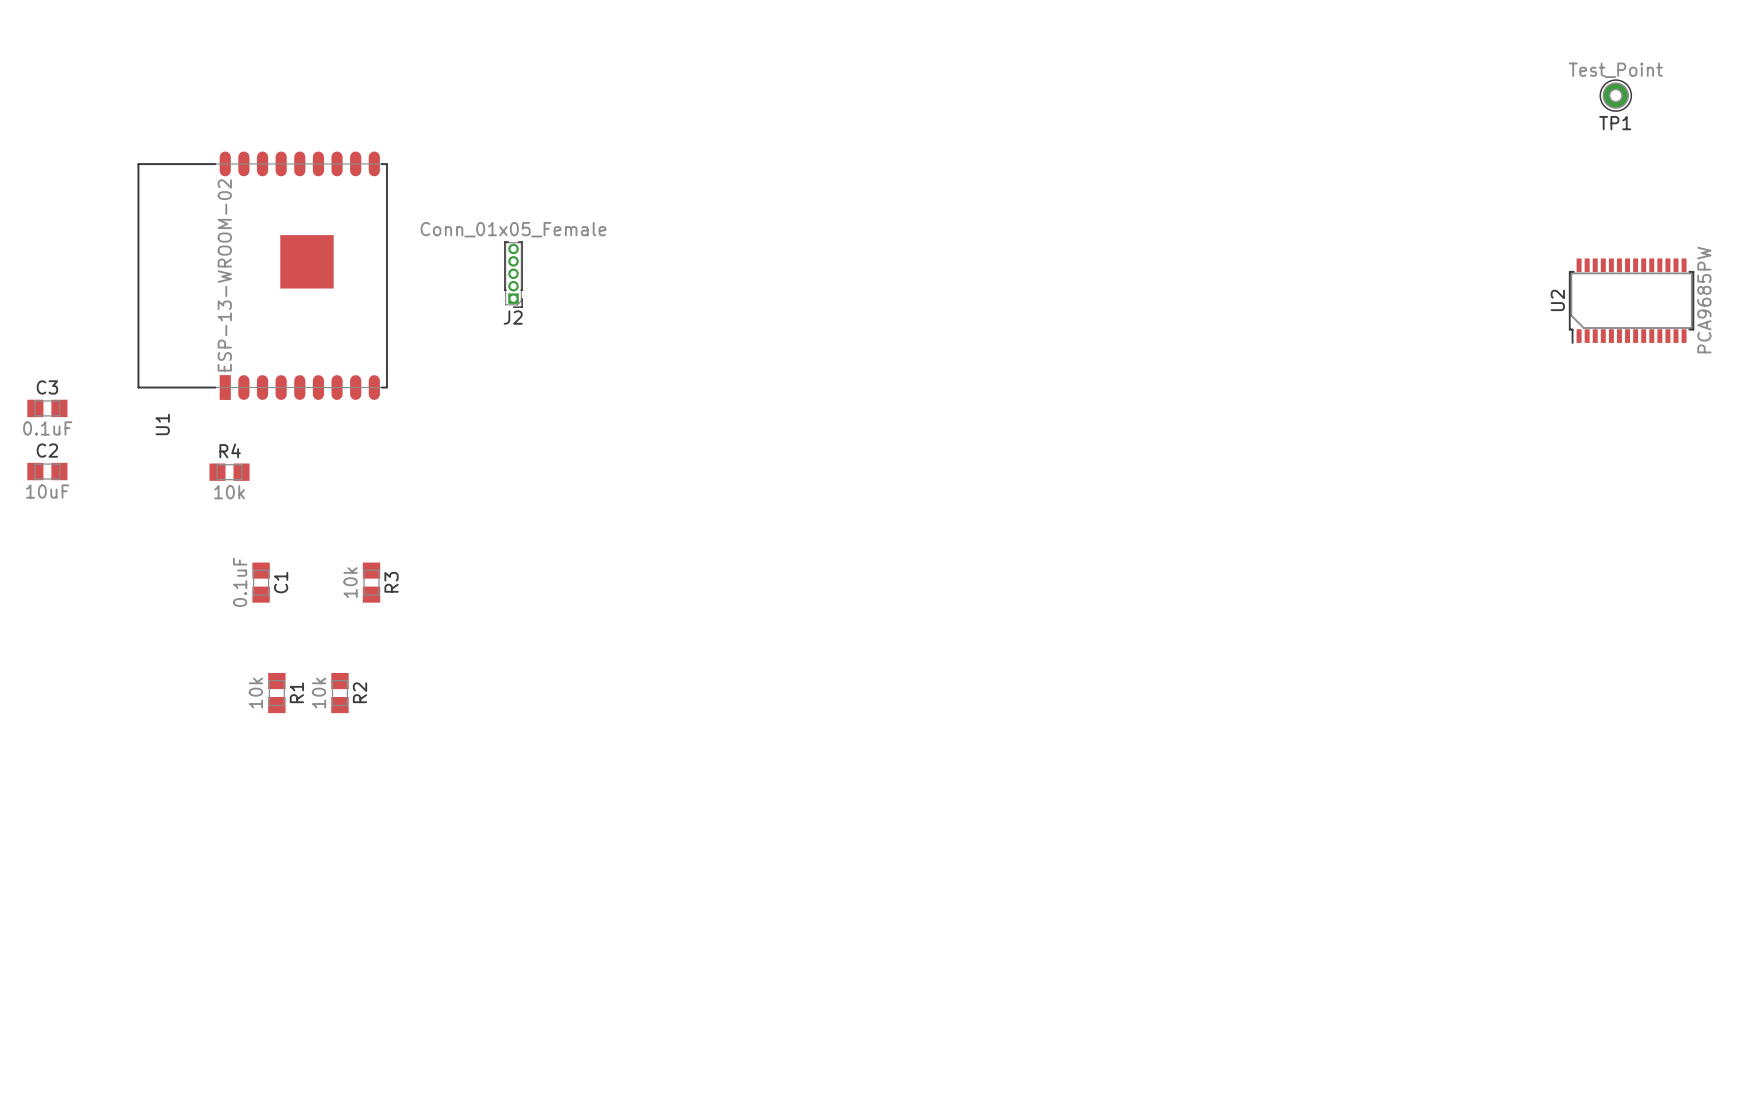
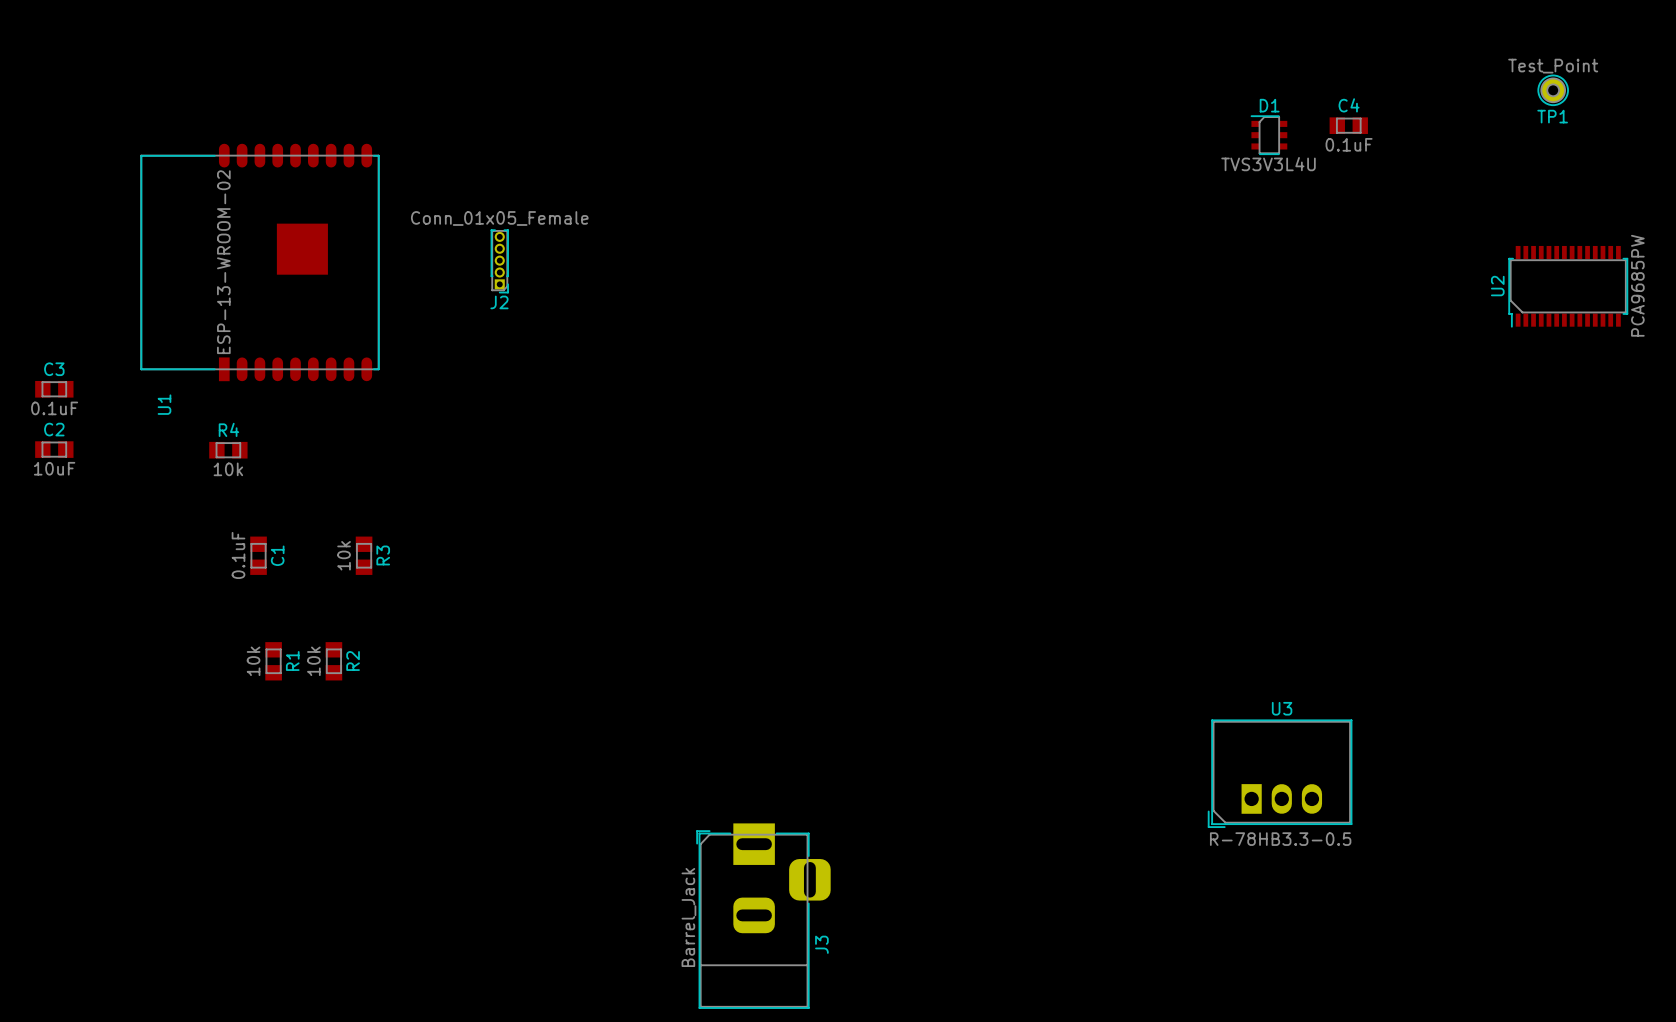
C4: none -> 0.1uF (1348, 125)
D1: none -> TVS3V3L4U (1269, 135)
U3: none -> R-78HB3.3-0.5 (1280, 773)
J3: none -> Barrel_Jack (763, 916)

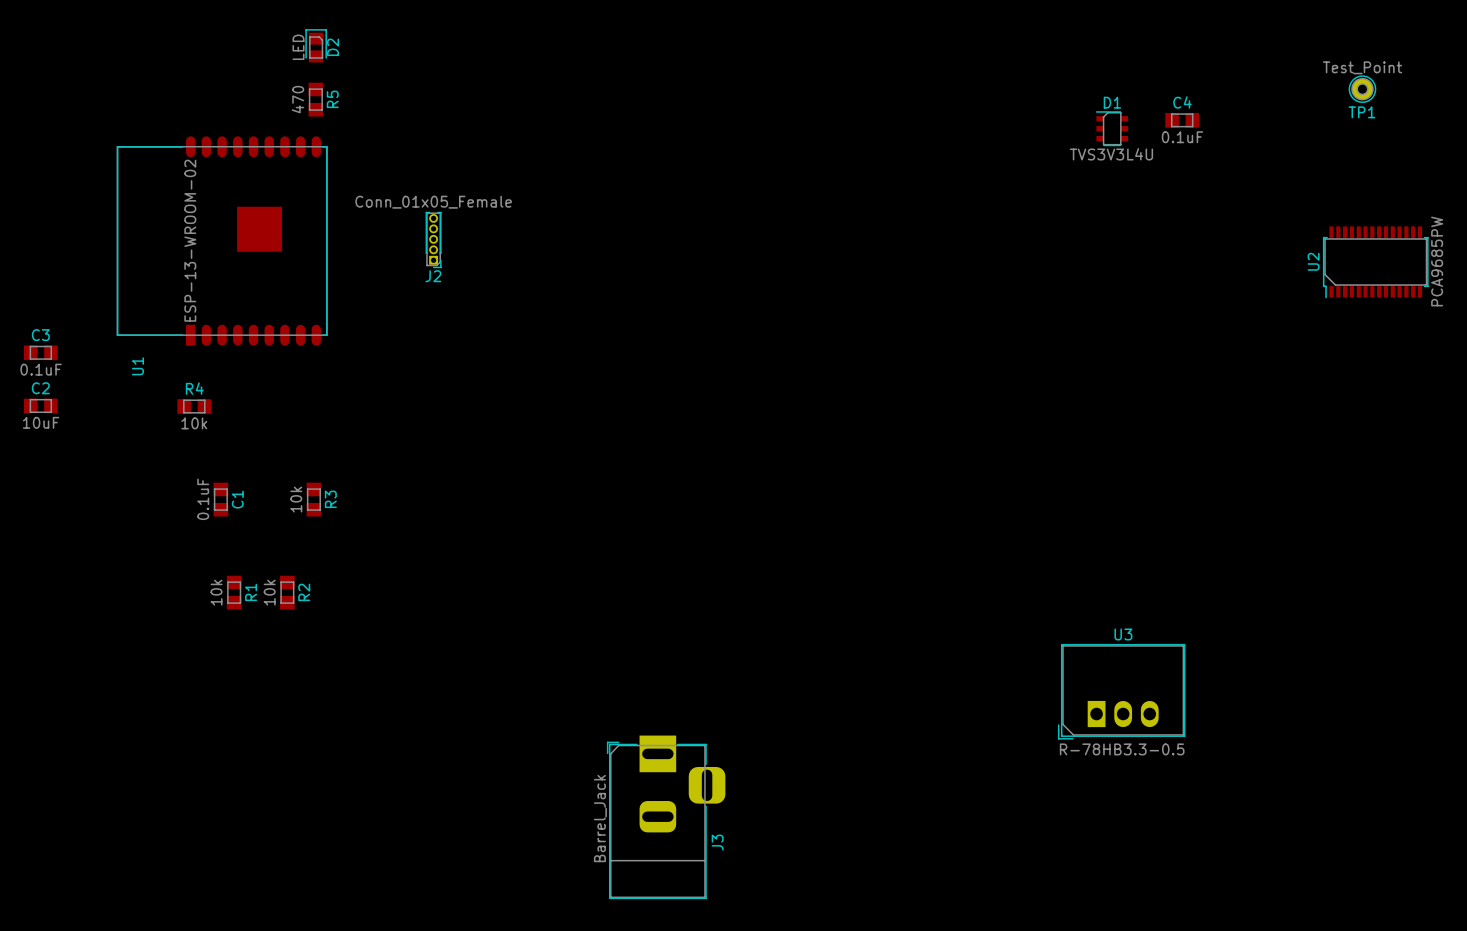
D2: none -> LED (316, 45)
R5: none -> 470 (315, 99)

